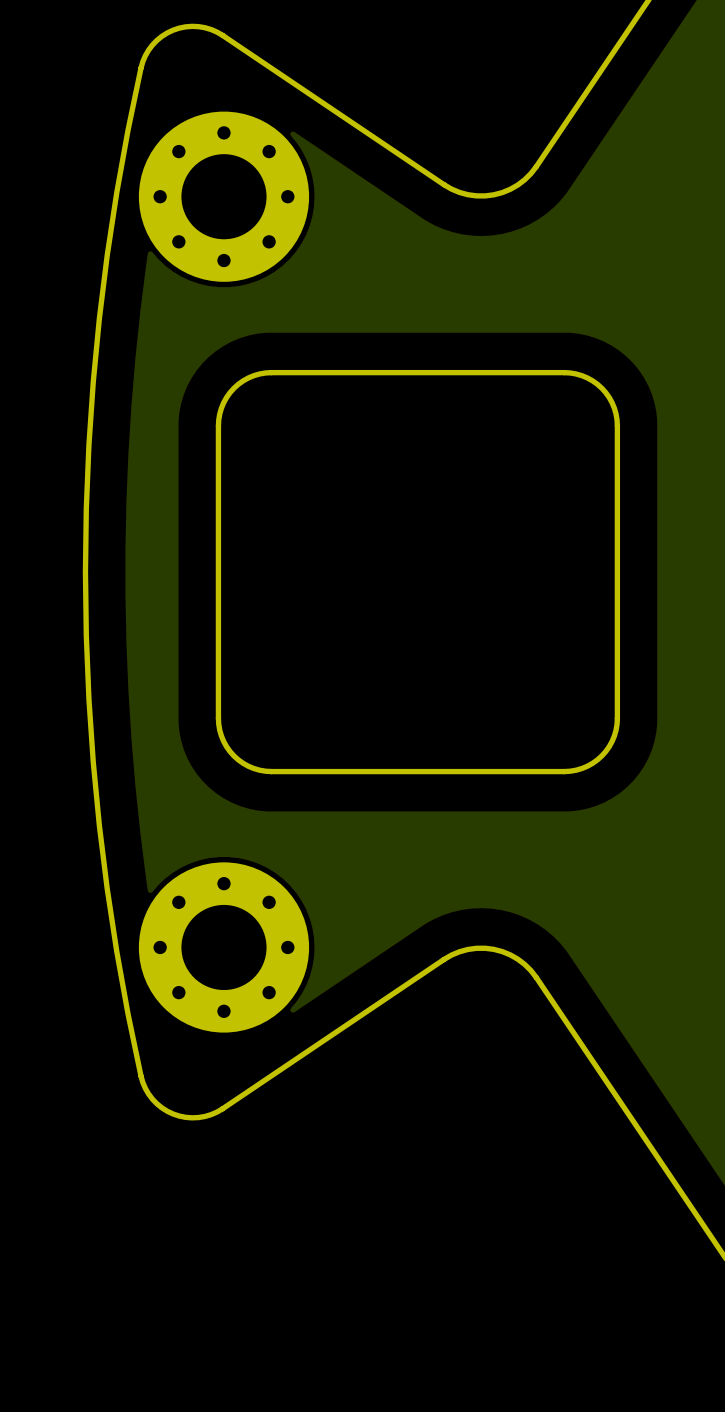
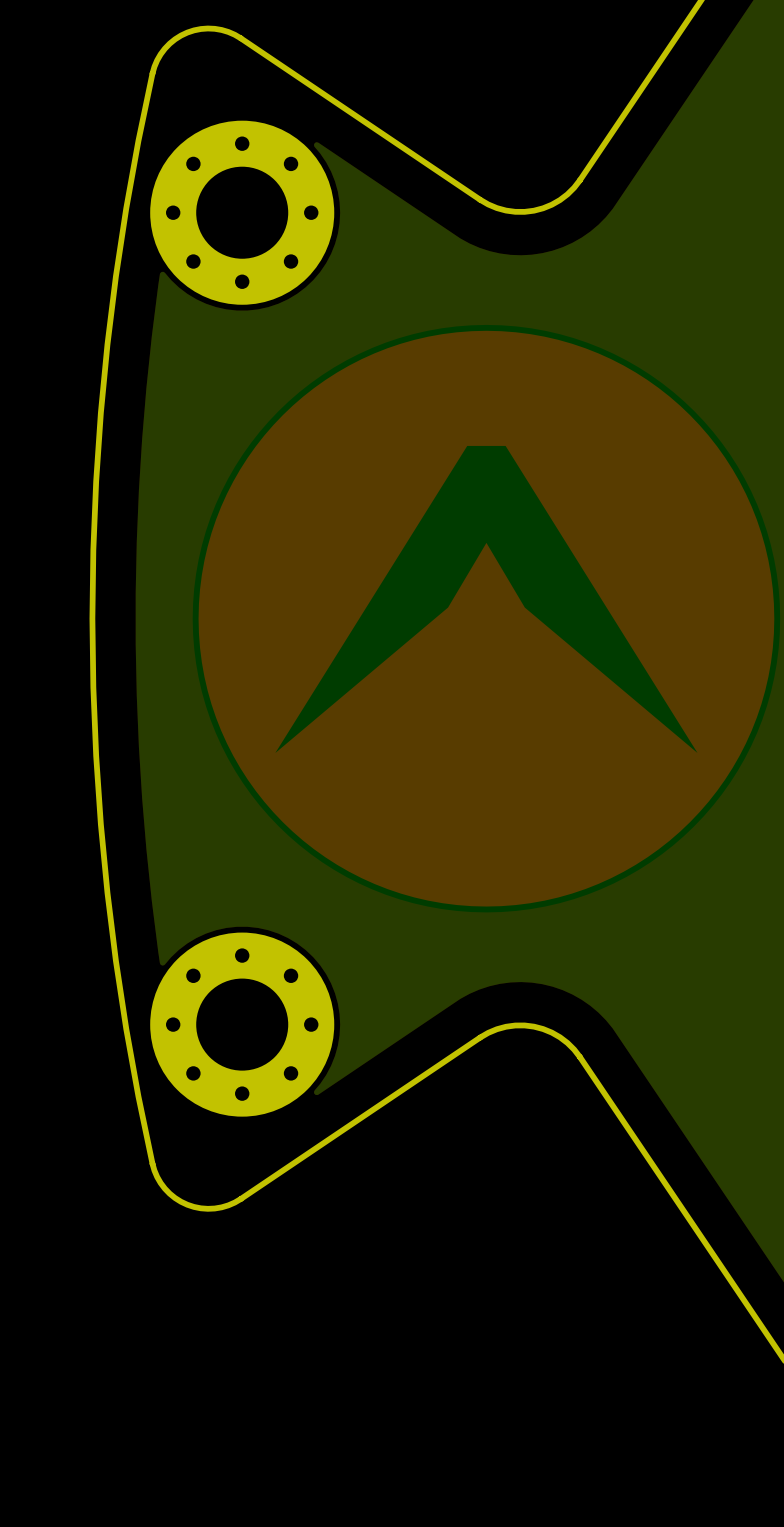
board edge: (564, 372) (265, 372) (243, 380) (230, 392) (221, 408) (218, 425) (218, 718) (223, 741) (238, 759) (254, 768) (271, 771) (564, 771) (587, 766) (605, 751) (614, 735) (617, 718) (617, 419) (609, 397) (597, 384) (581, 375) (564, 372) -> none
part: none -> (486, 618)

